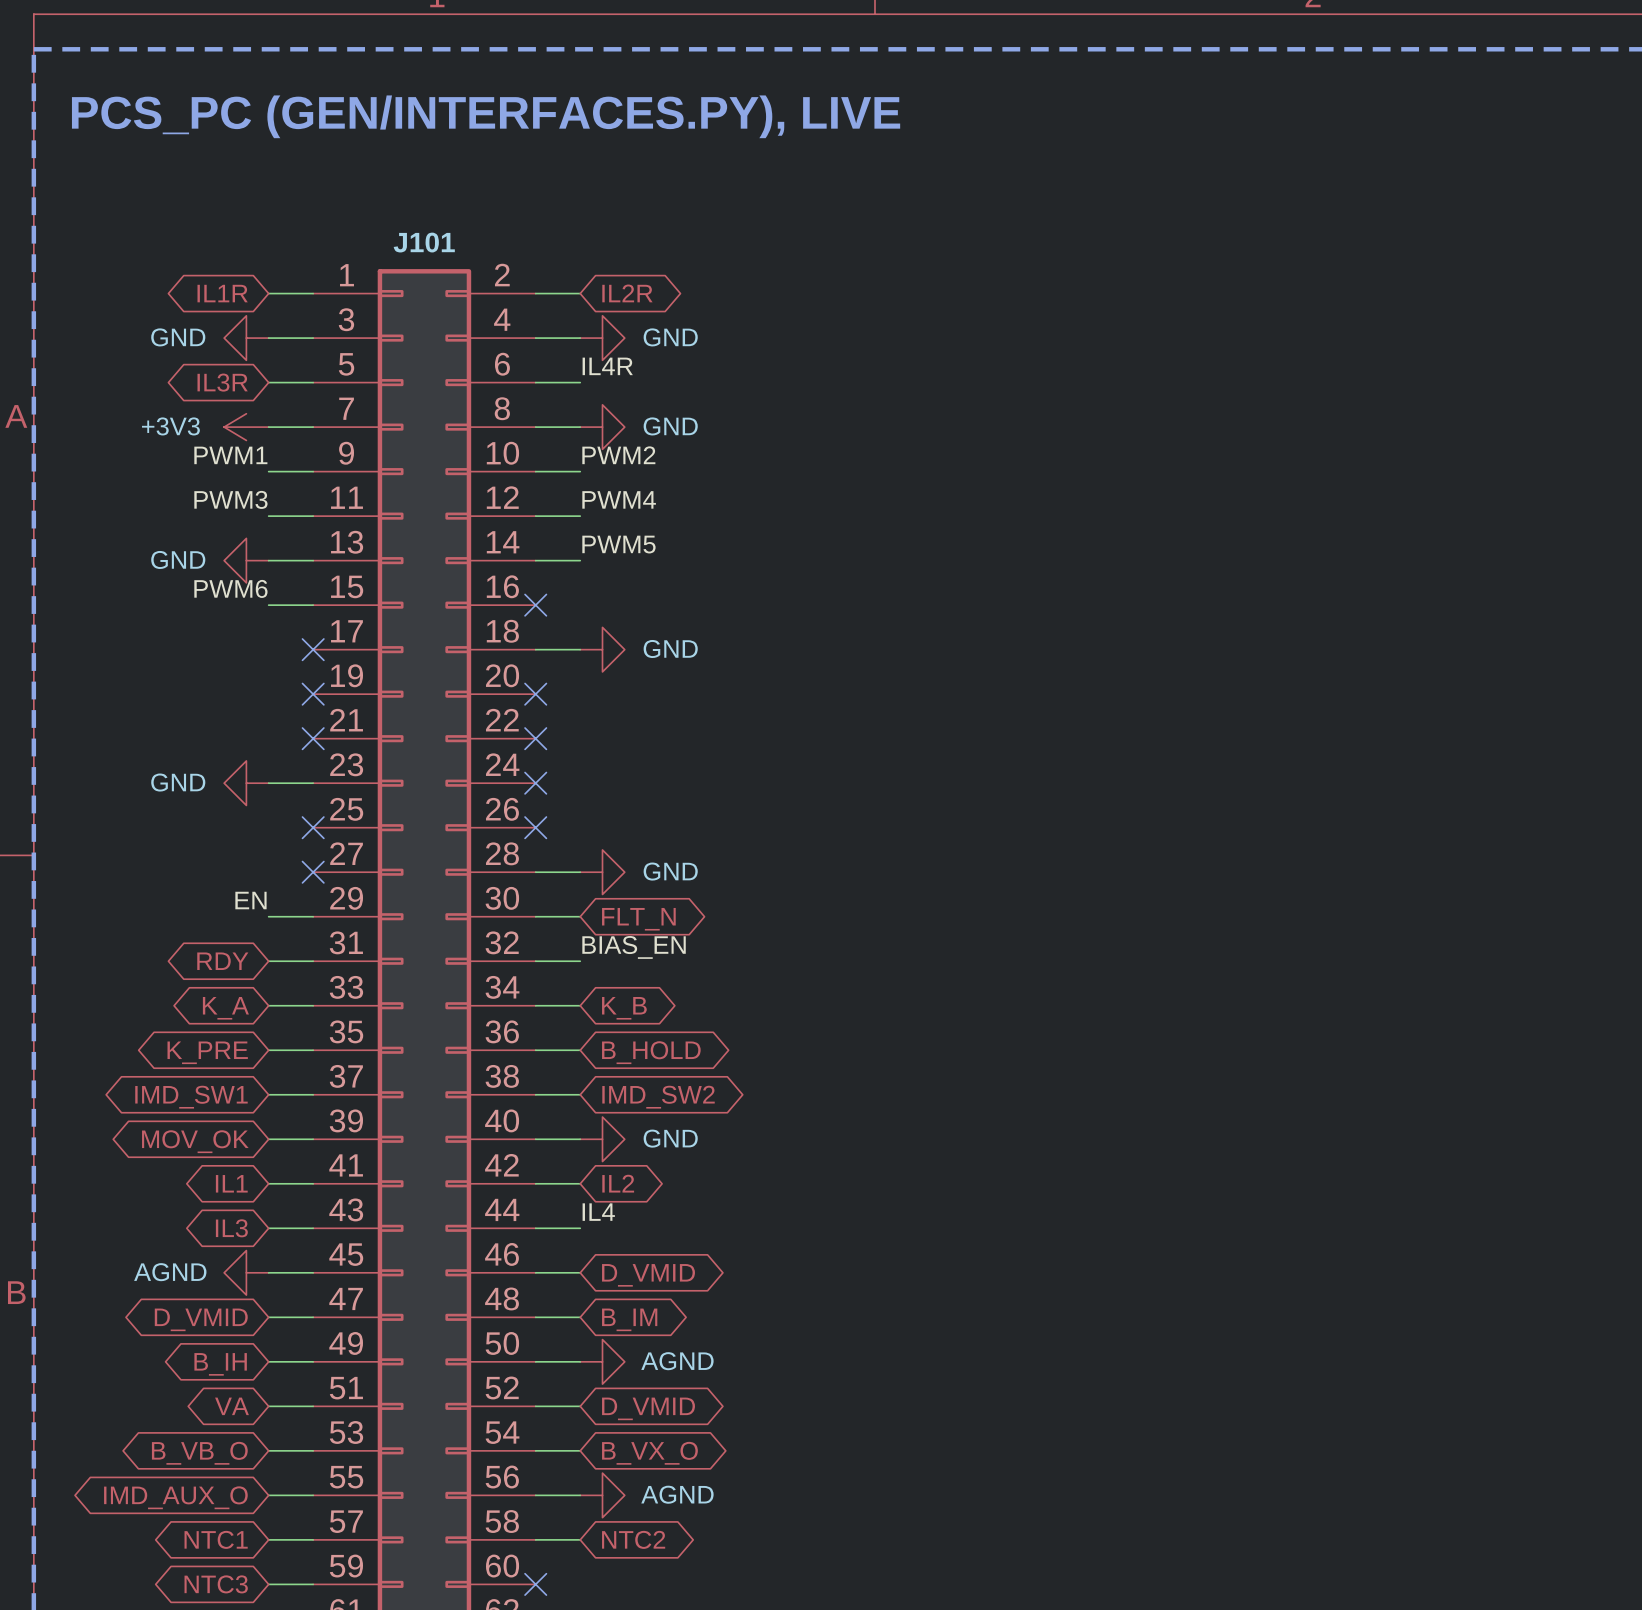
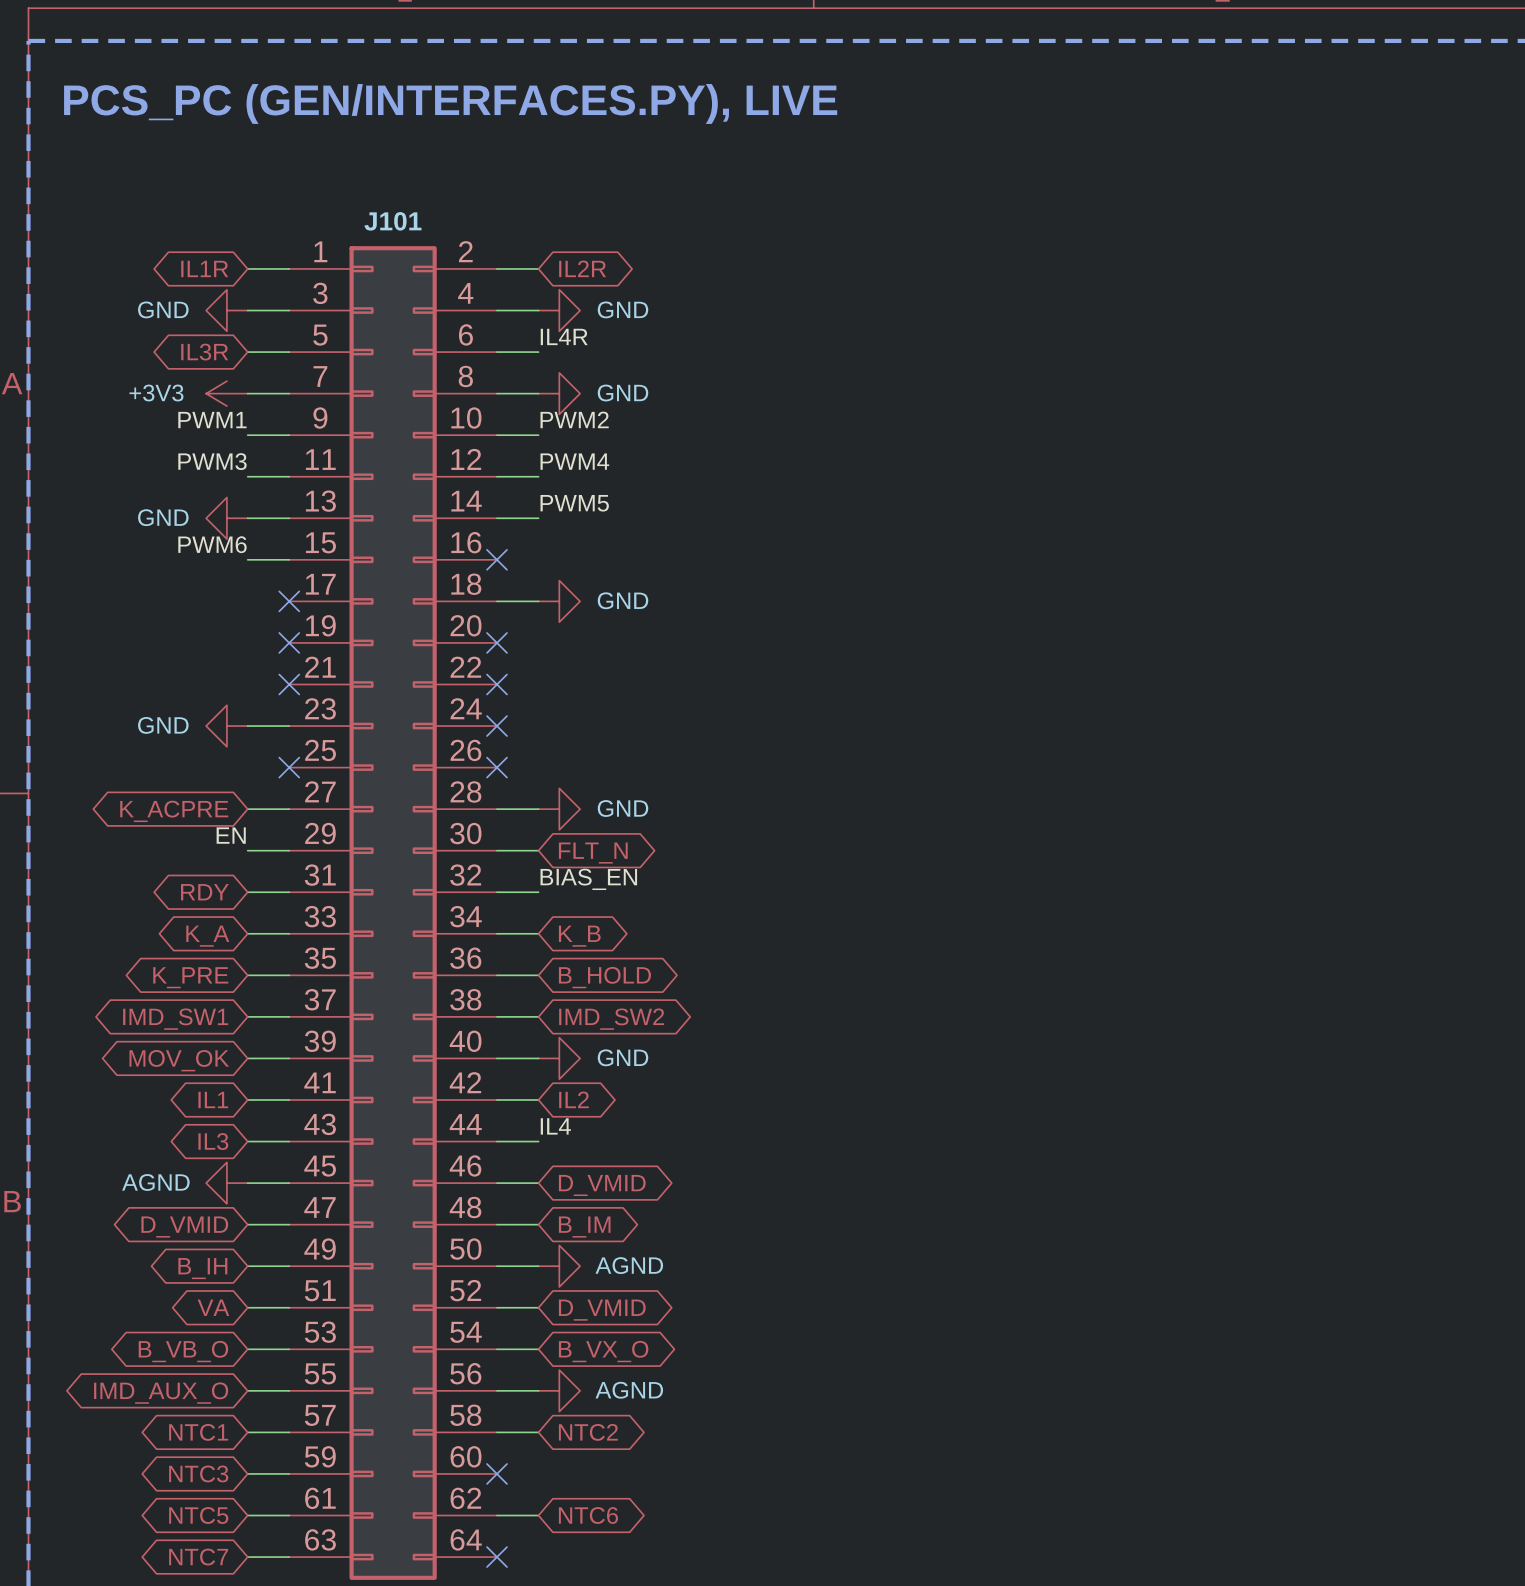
wire: none -> (247, 809) (289, 809)
no-connect mark: (313, 872) -> none
global label: none -> K_ACPRE (174, 811)

